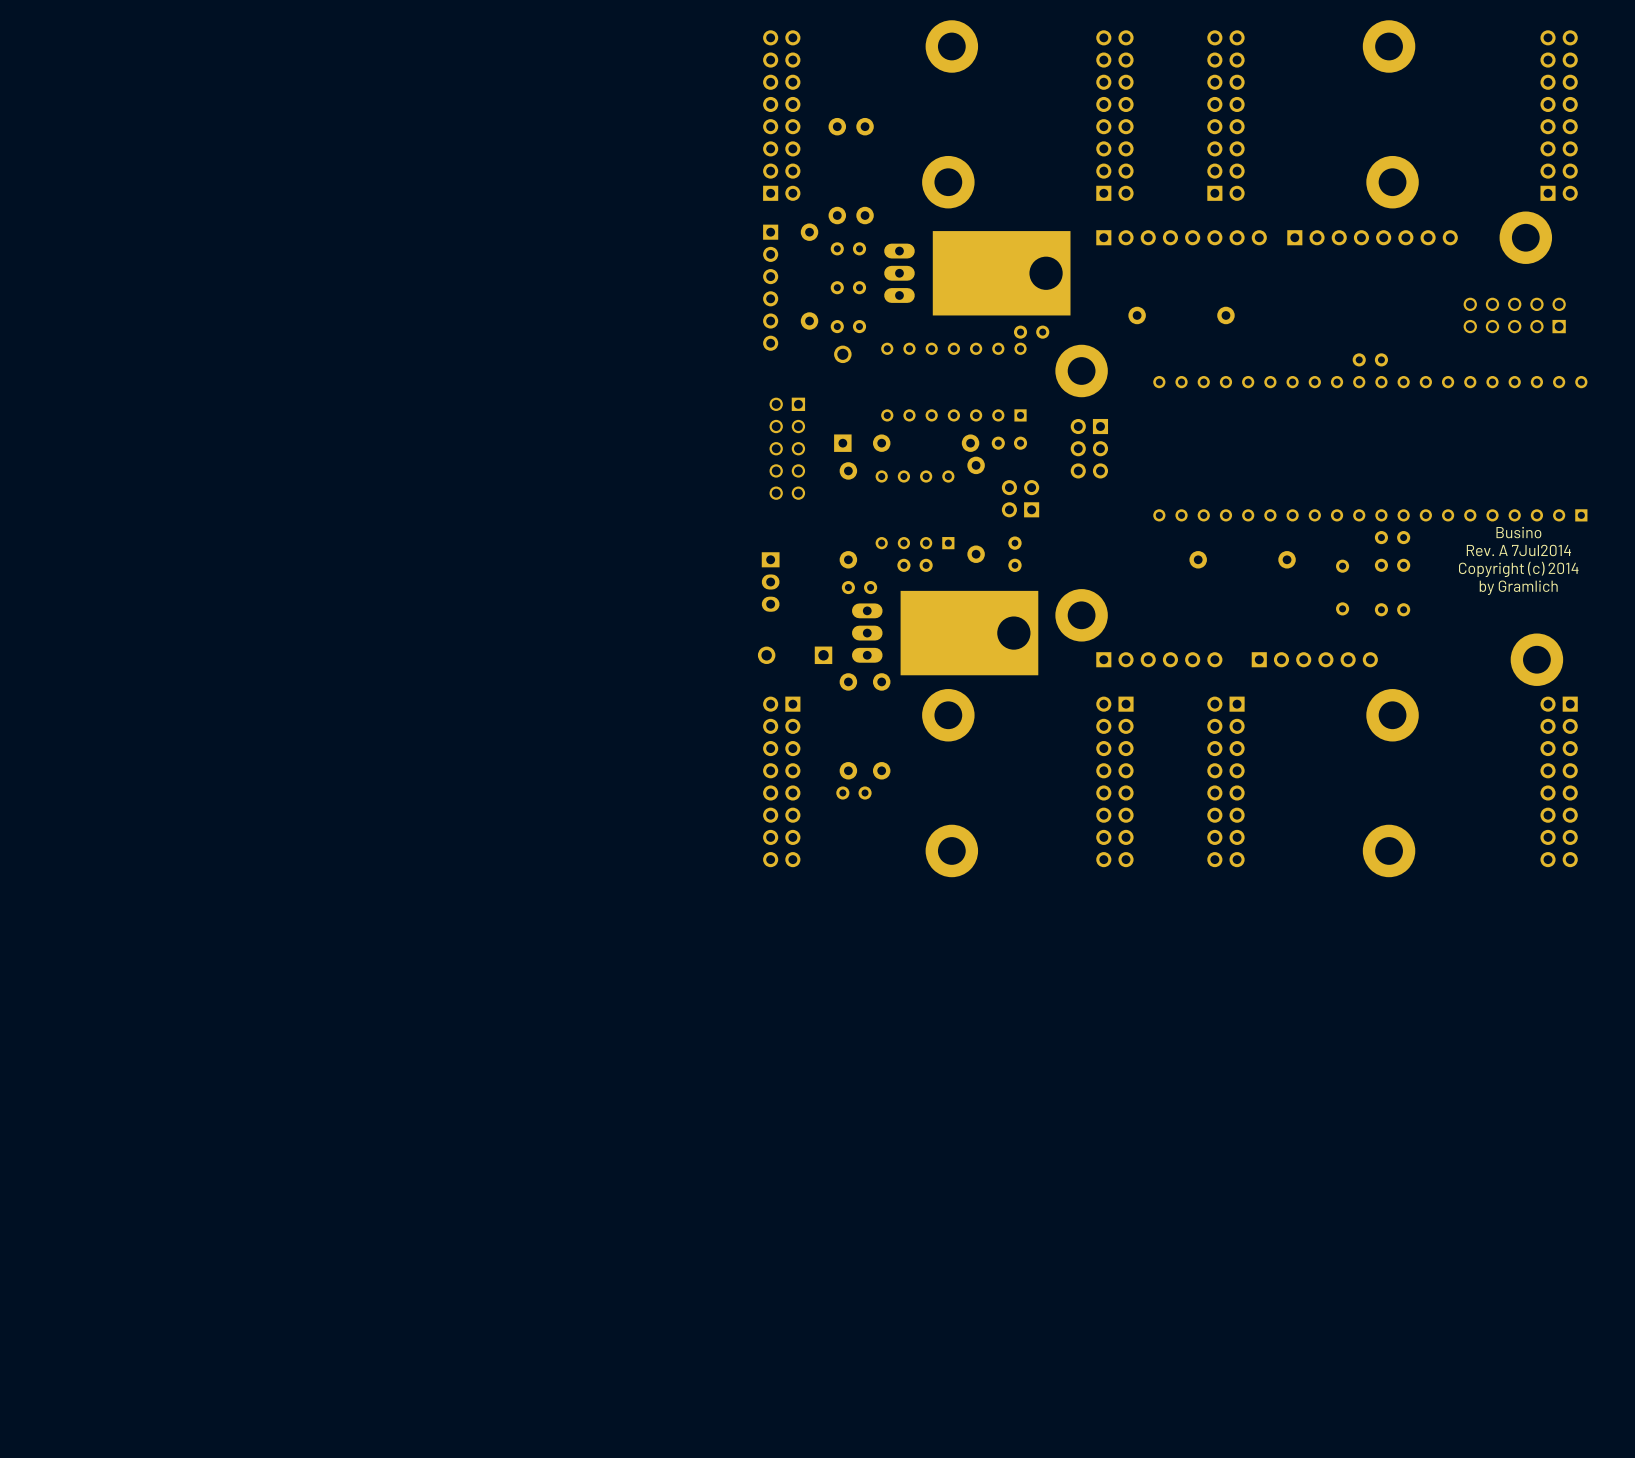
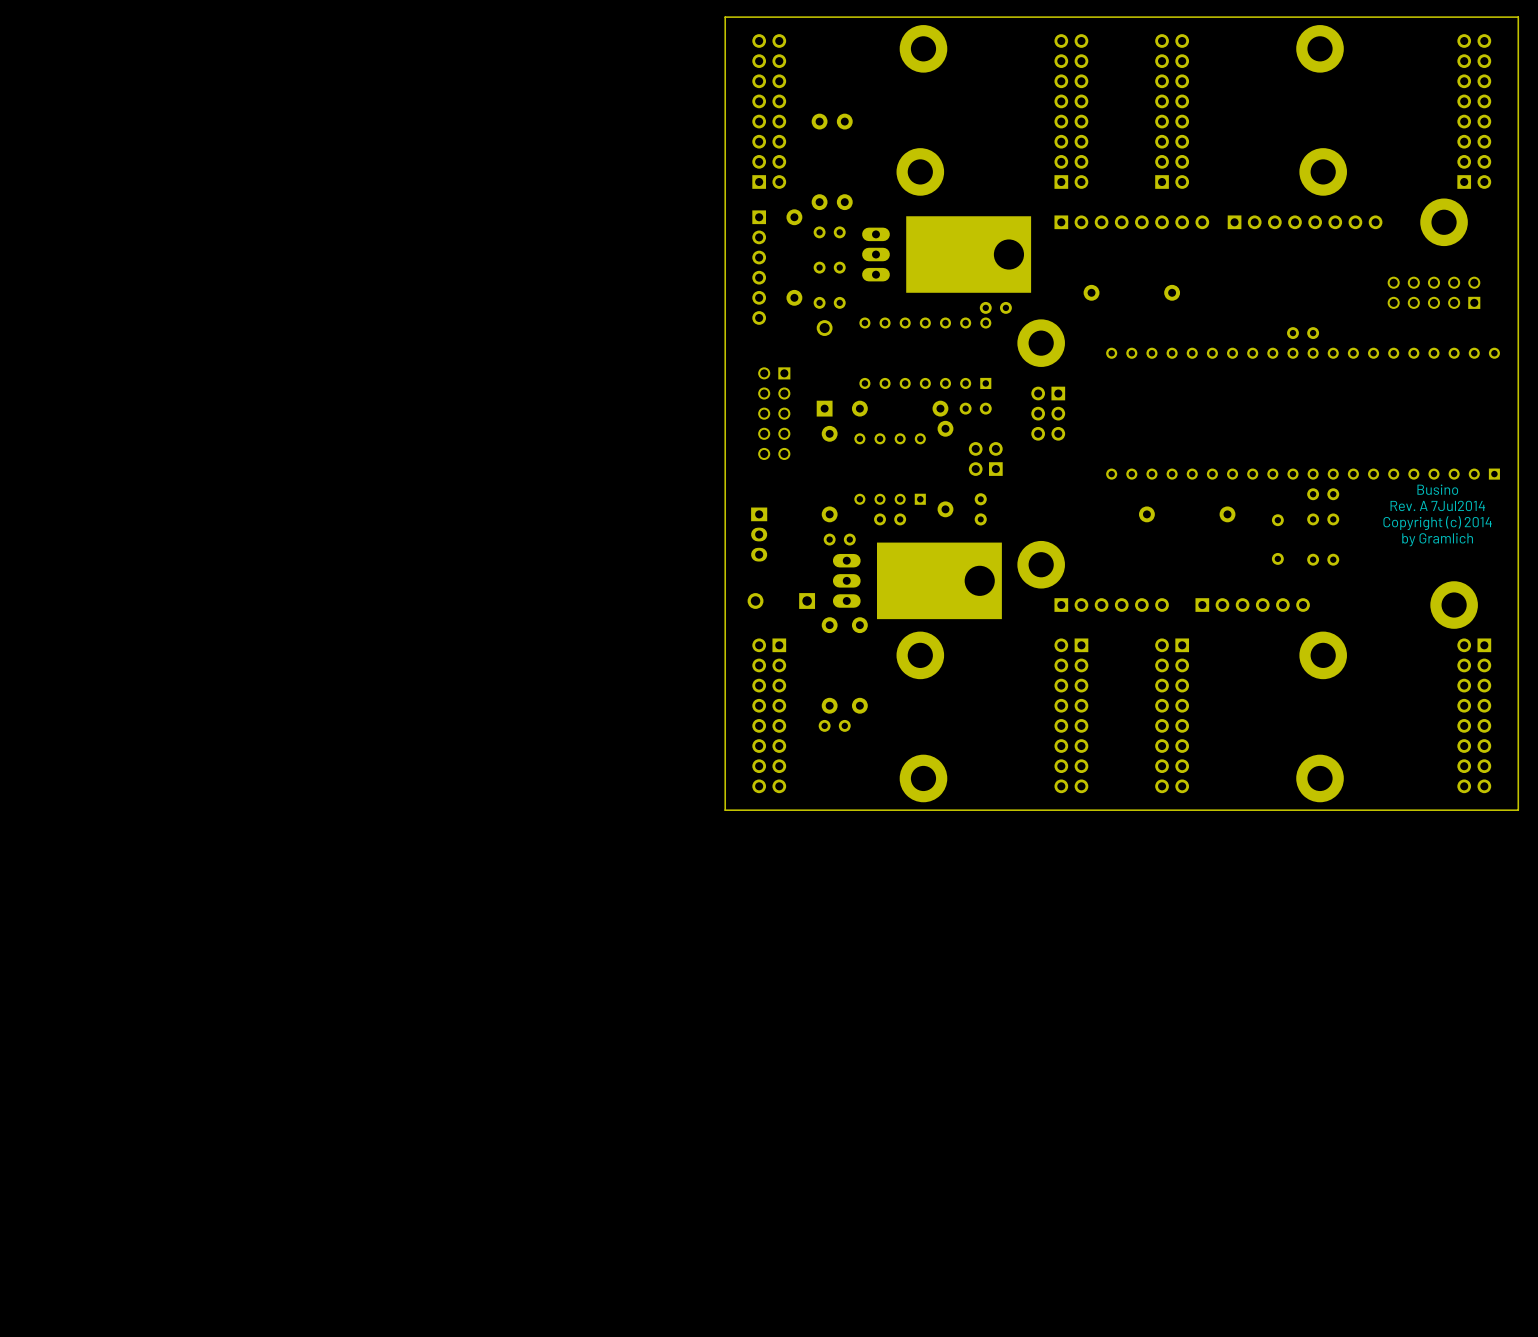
board edge: none -> (1518, 17) (1518, 810) (725, 810) (725, 17) (1518, 17)

